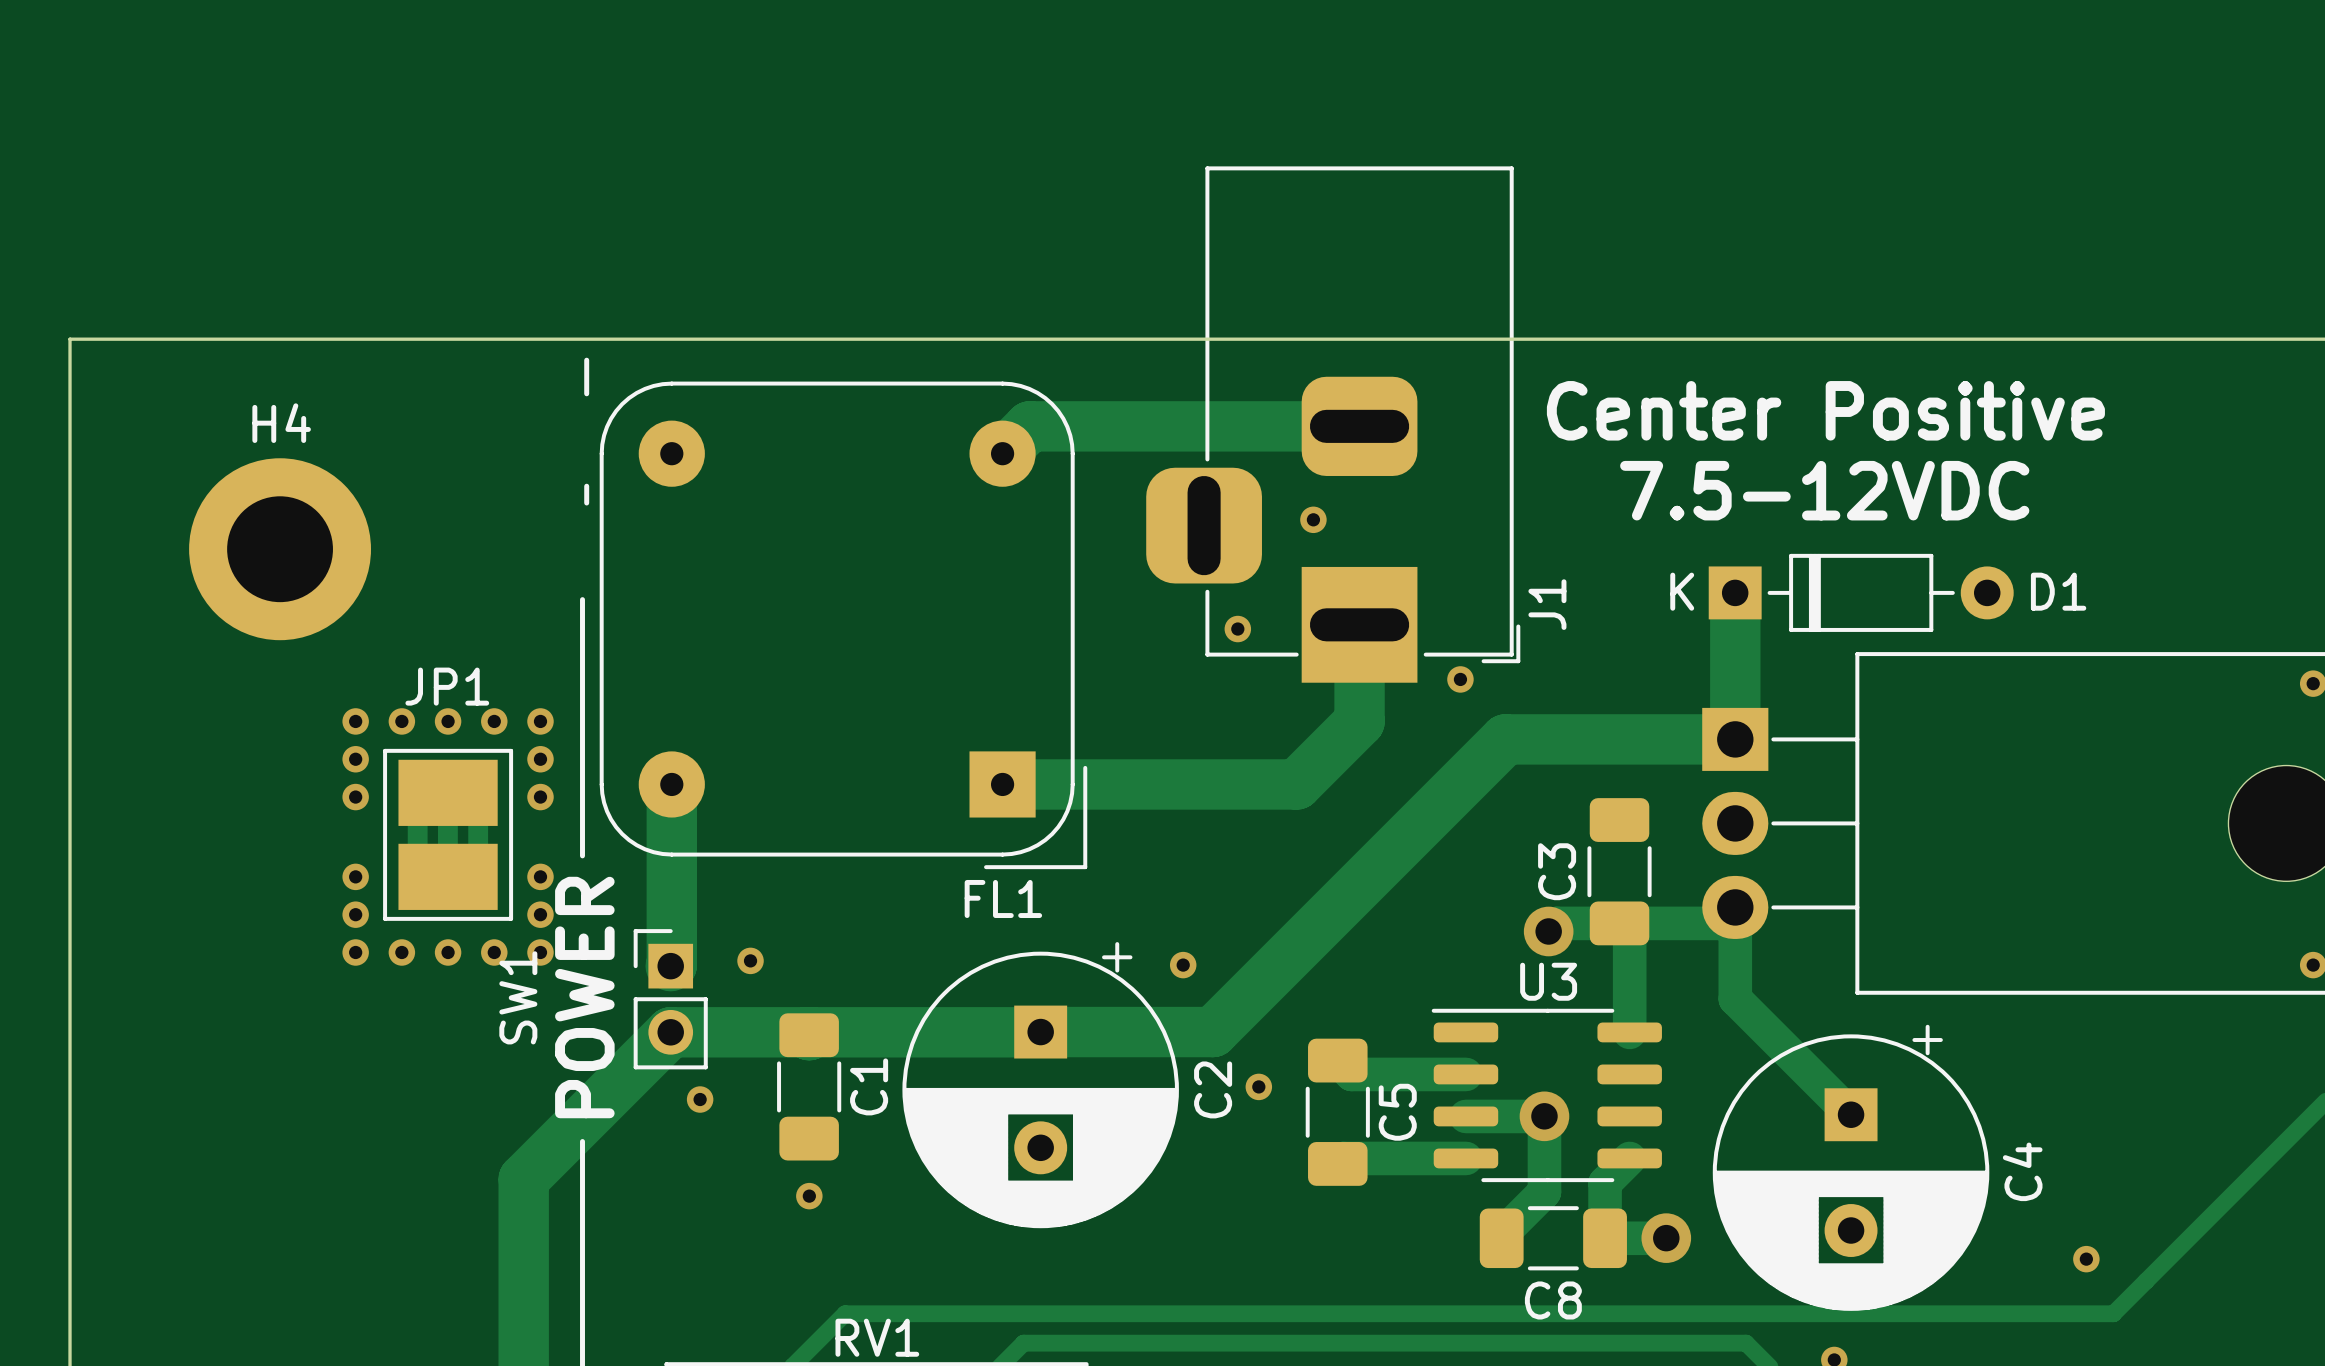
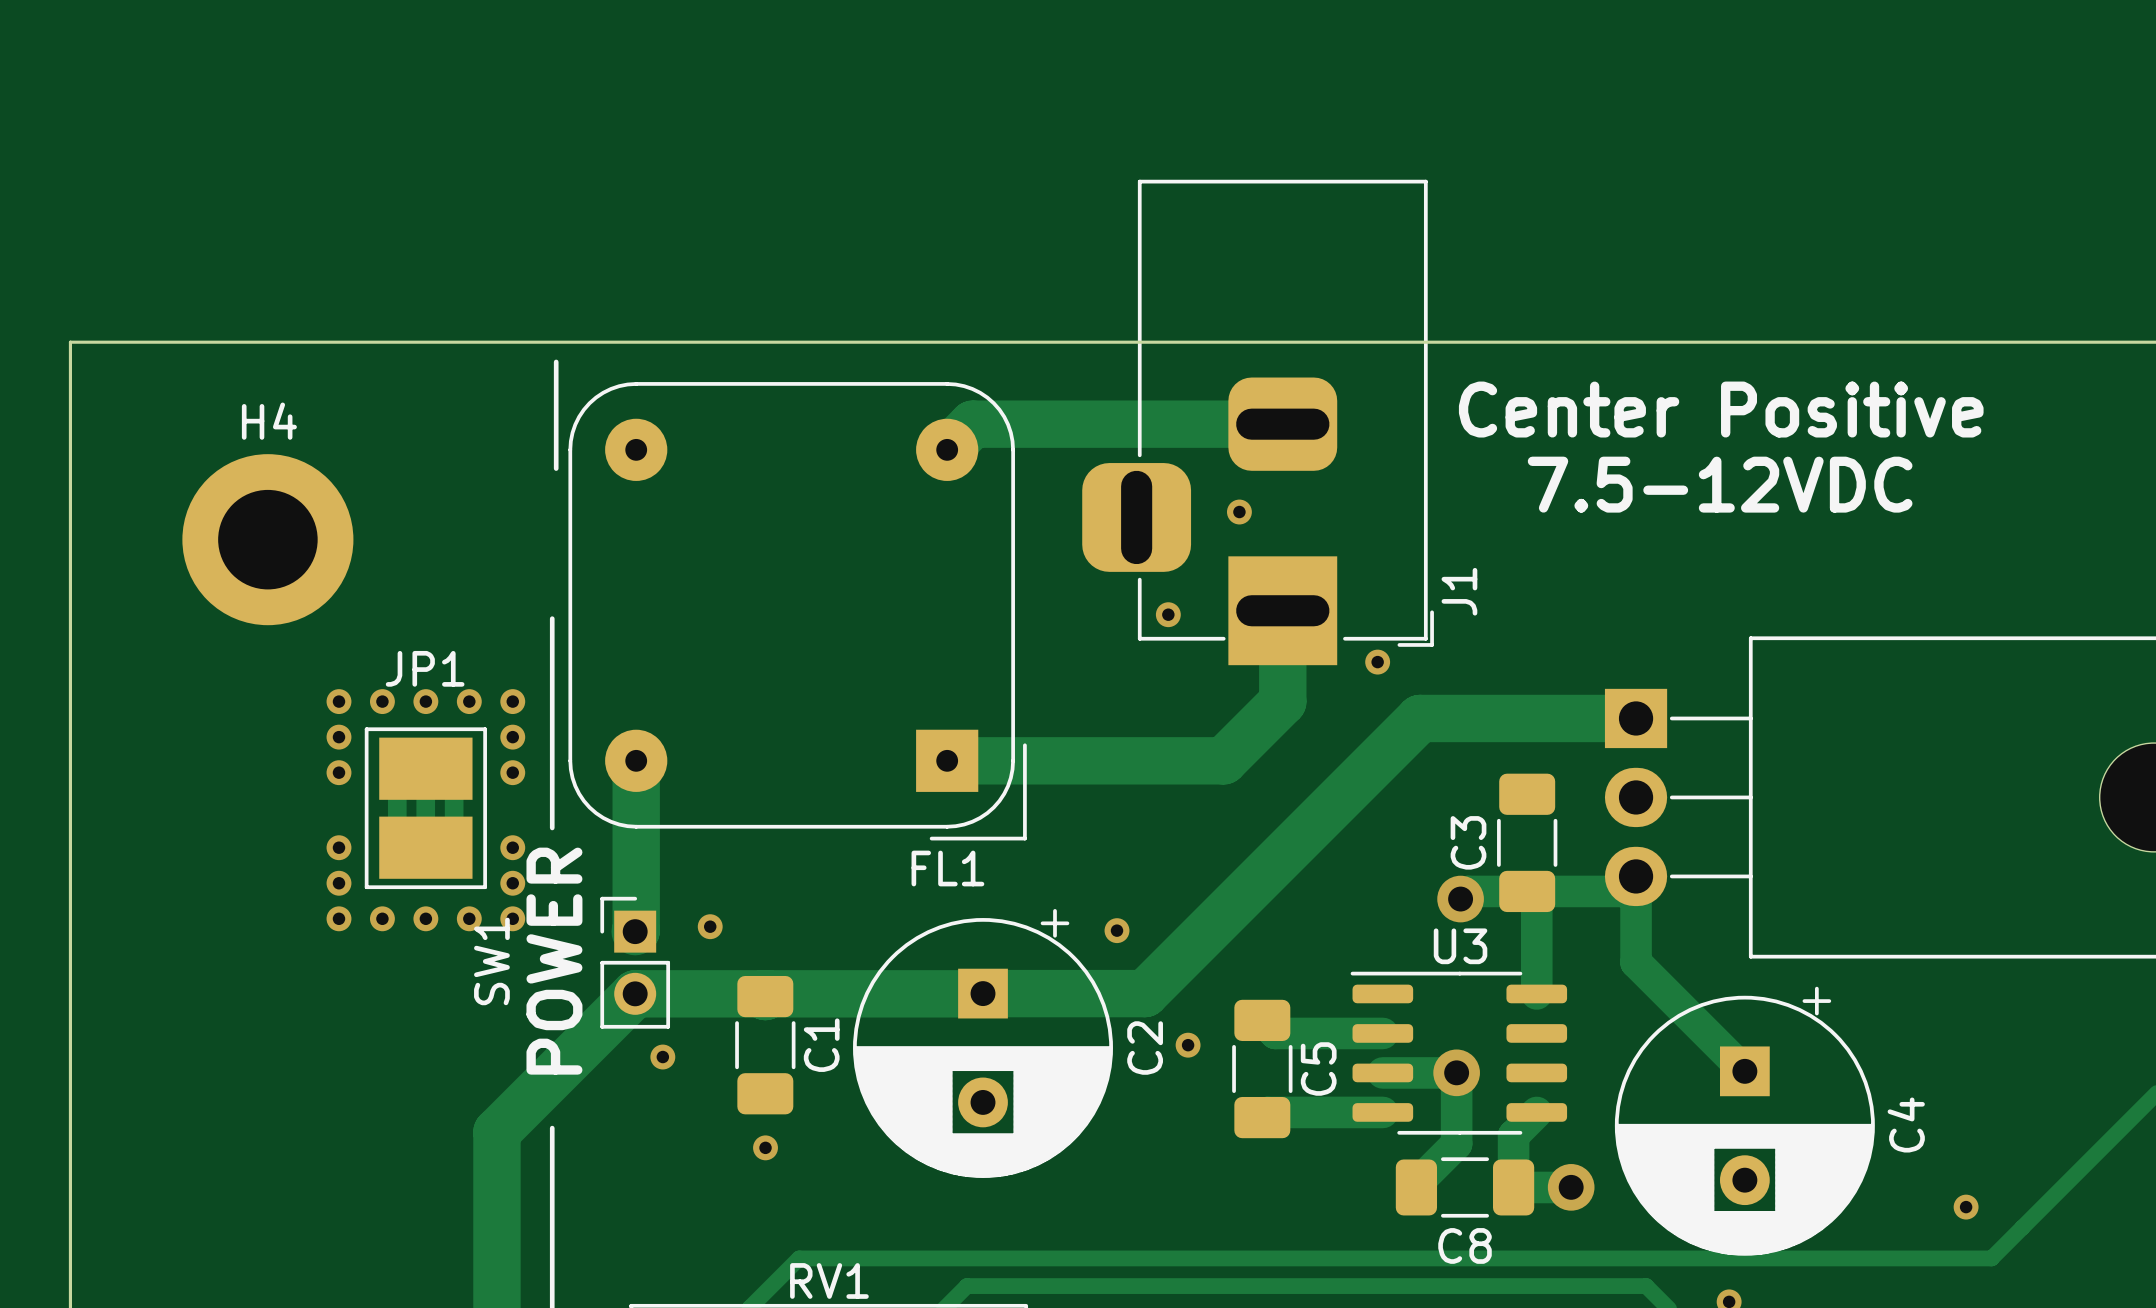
line: none -> (556, 393) (556, 468)
line: (586, 486) (586, 503) -> none
D1: (1861, 592) -> none
track: (1735, 593) (1735, 739) -> none
line: (582, 599) (582, 633) -> none
line: (582, 1141) (582, 1175) -> none

